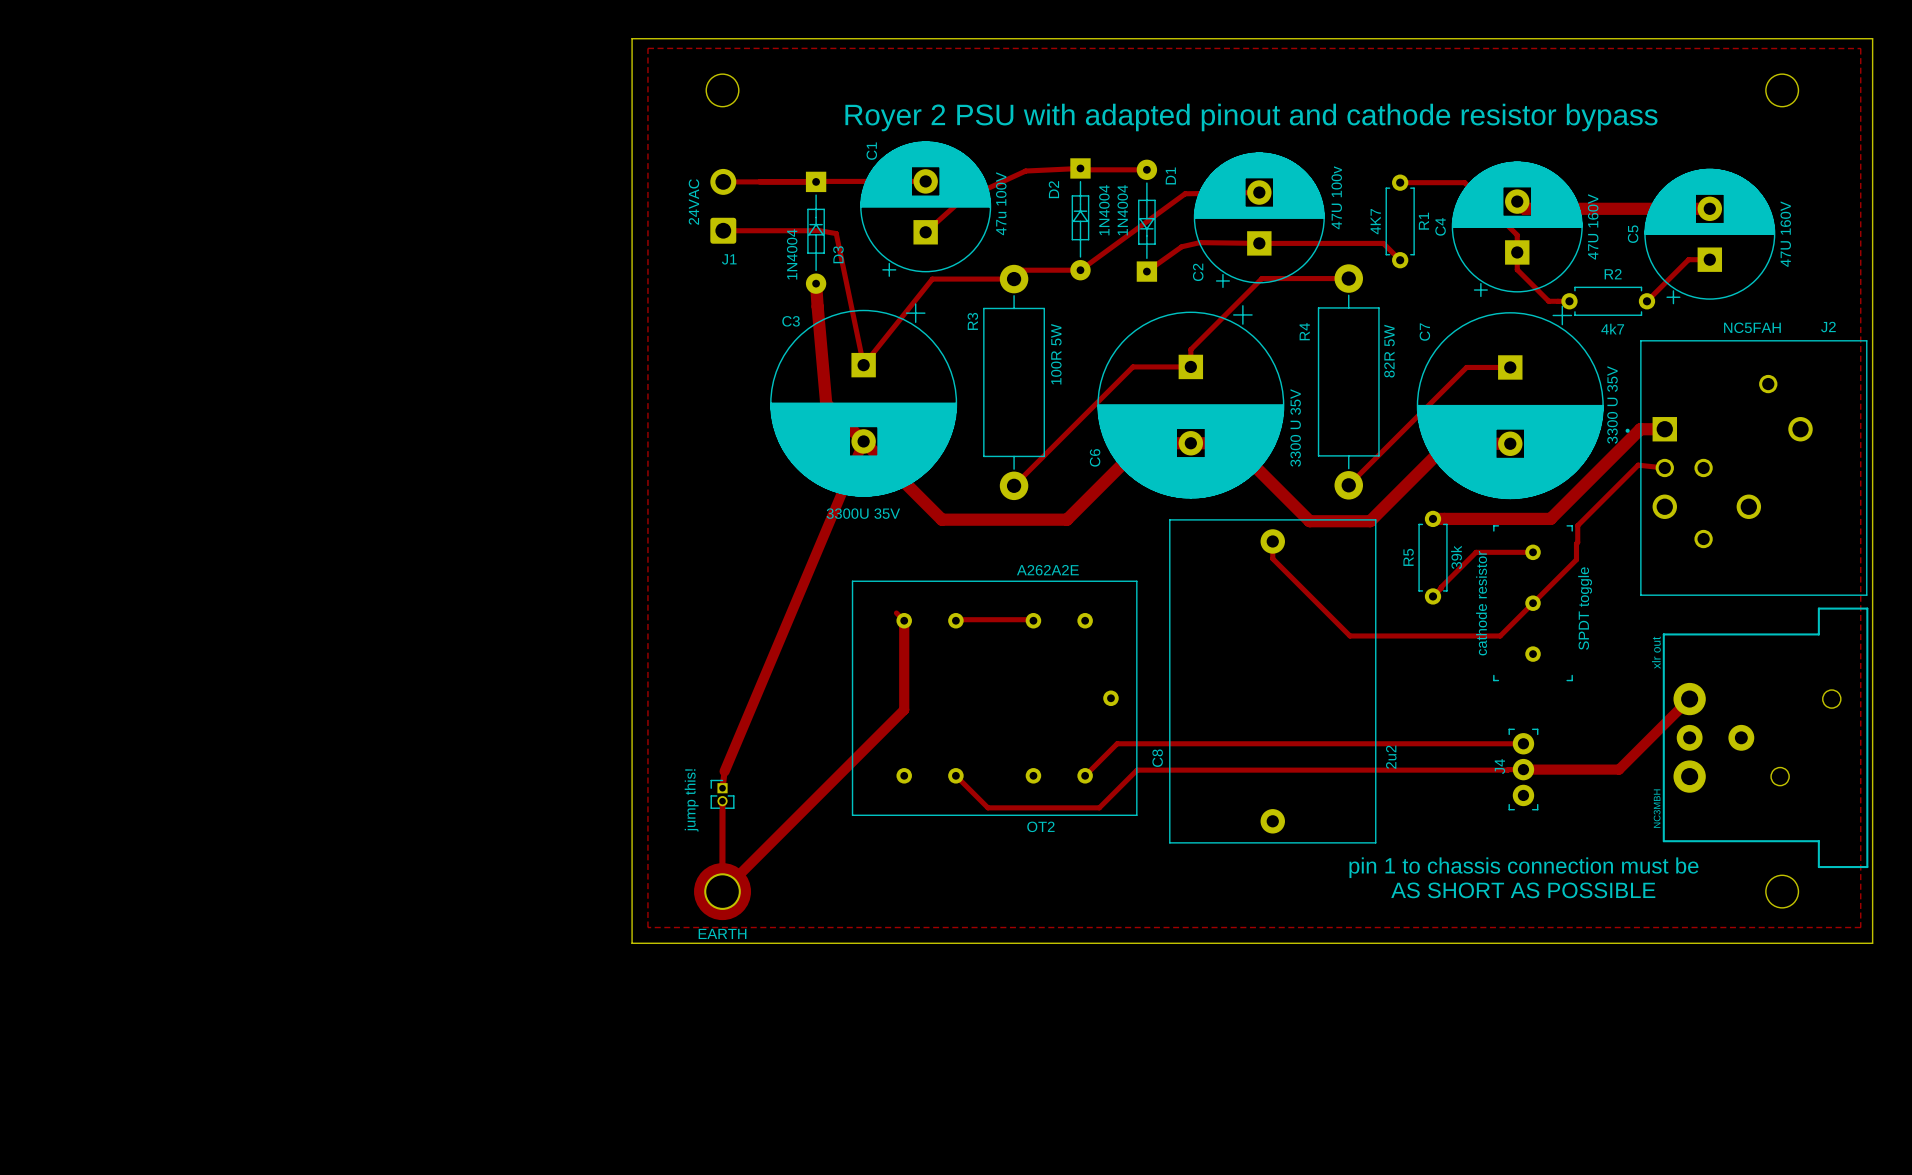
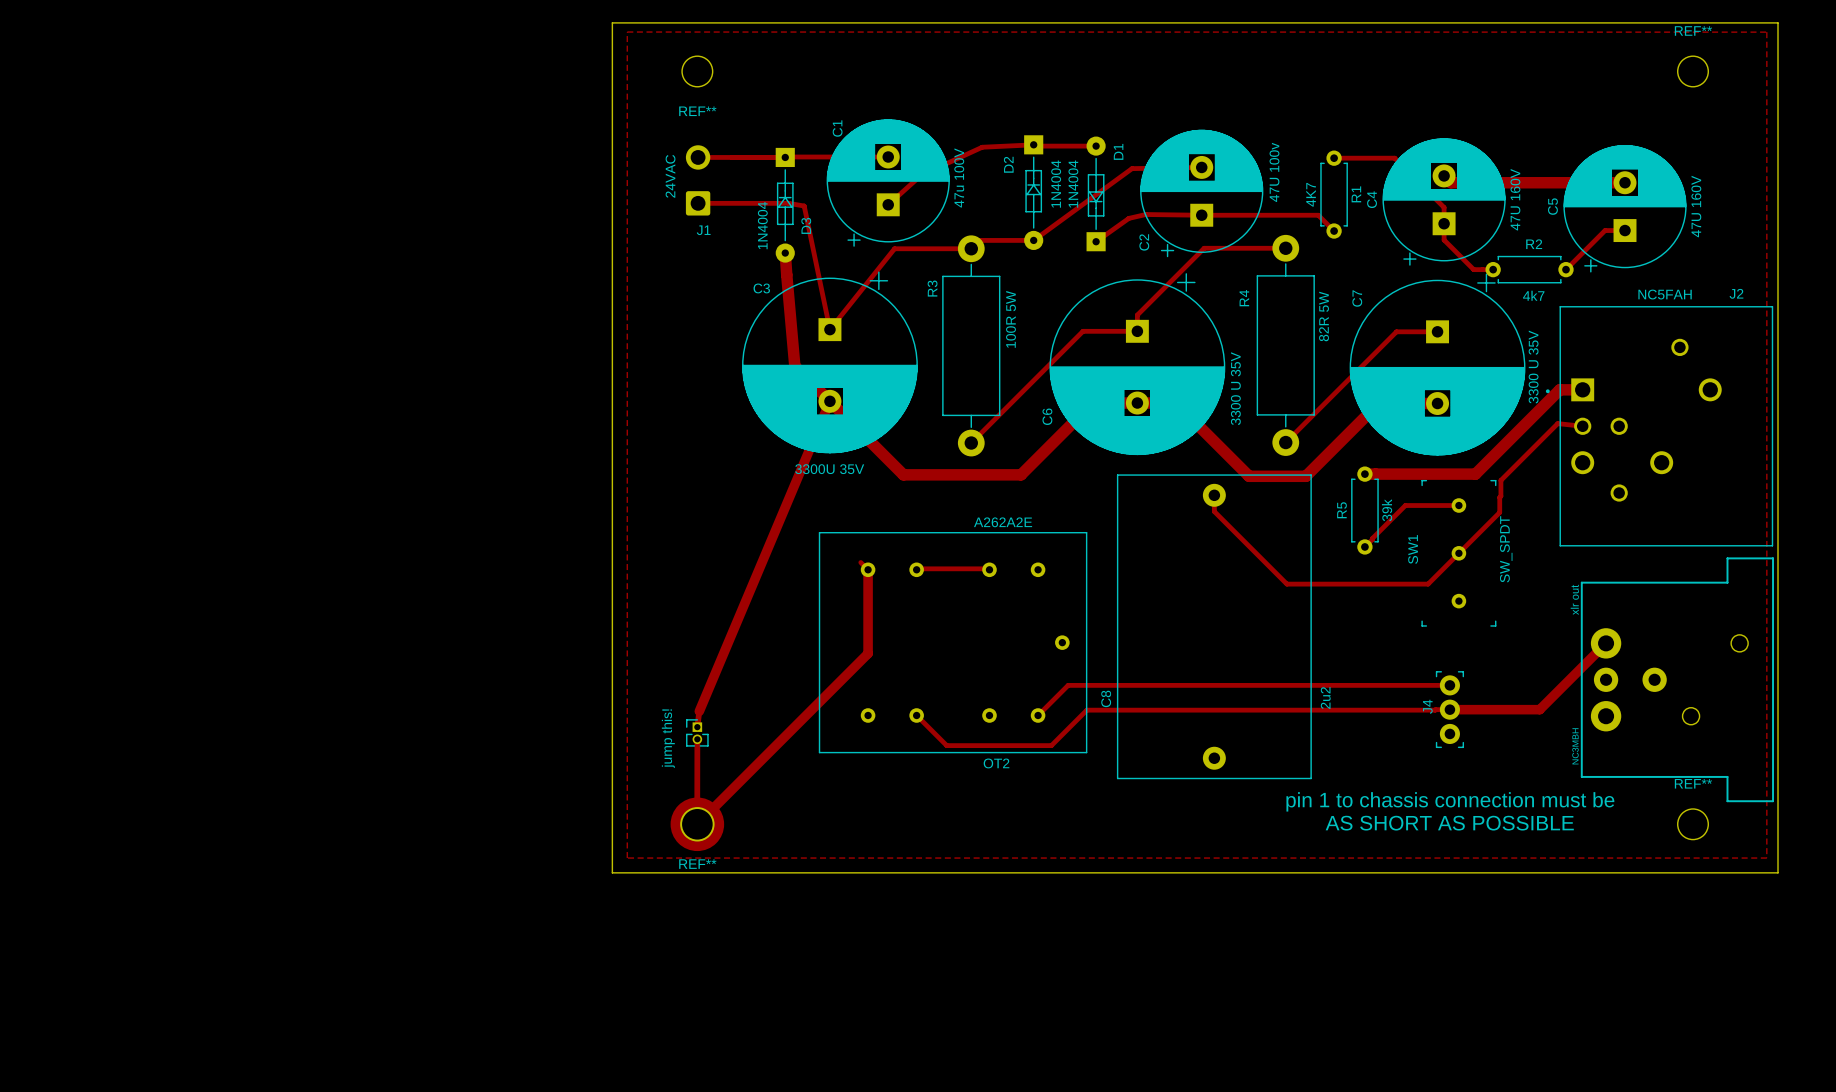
REF** name: none -> REF** (1693, 30)
text: Royer 2 PSU with adapted pinout and cathode resistor bypass (1251, 117) -> none
REF** name: none -> REF** (697, 111)
cathode resistor name: cathode resistor (1481, 603) -> SW1 (1413, 549)
cathode resistor value: SPDT toggle (1585, 608) -> SW_SPDT (1506, 549)
REF** name: none -> REF** (1693, 783)
EARTH name: EARTH (722, 933) -> REF** (697, 864)

